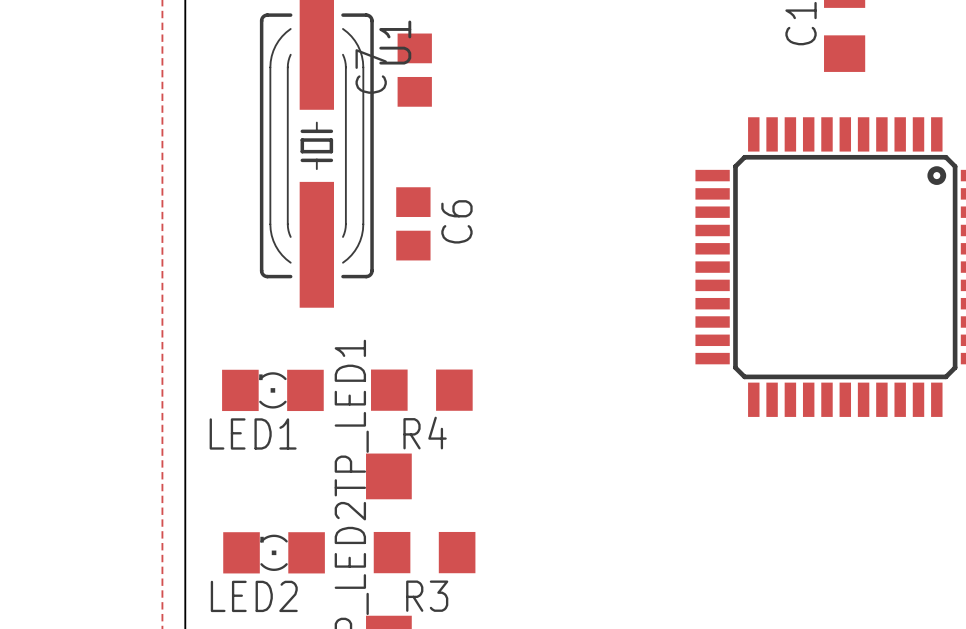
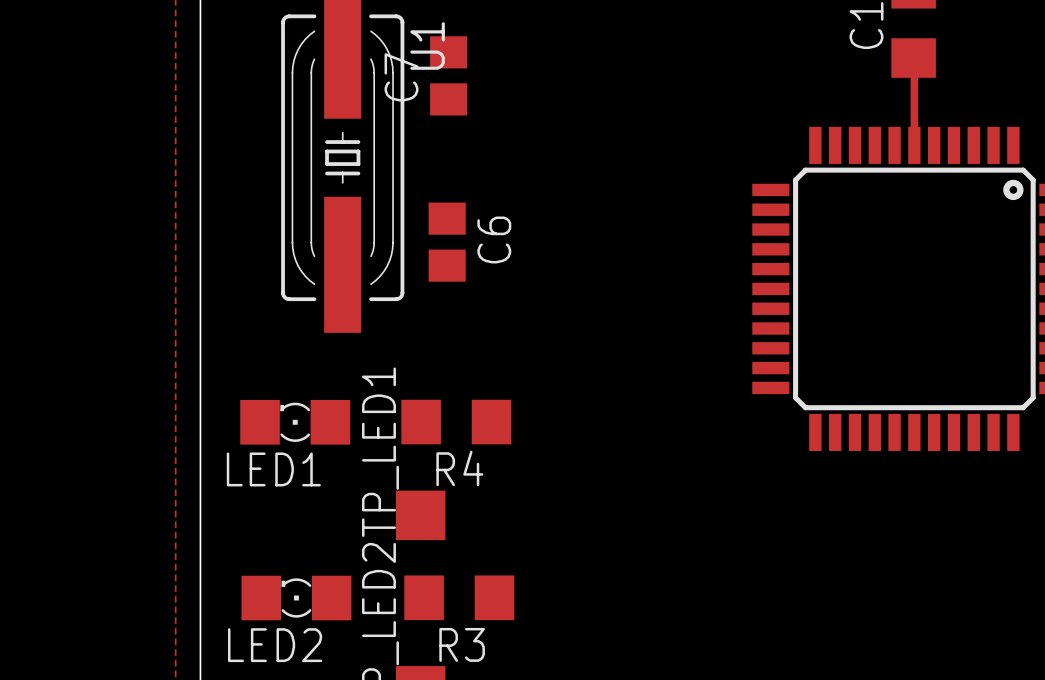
top track: none -> (913, 58) (914, 145)

